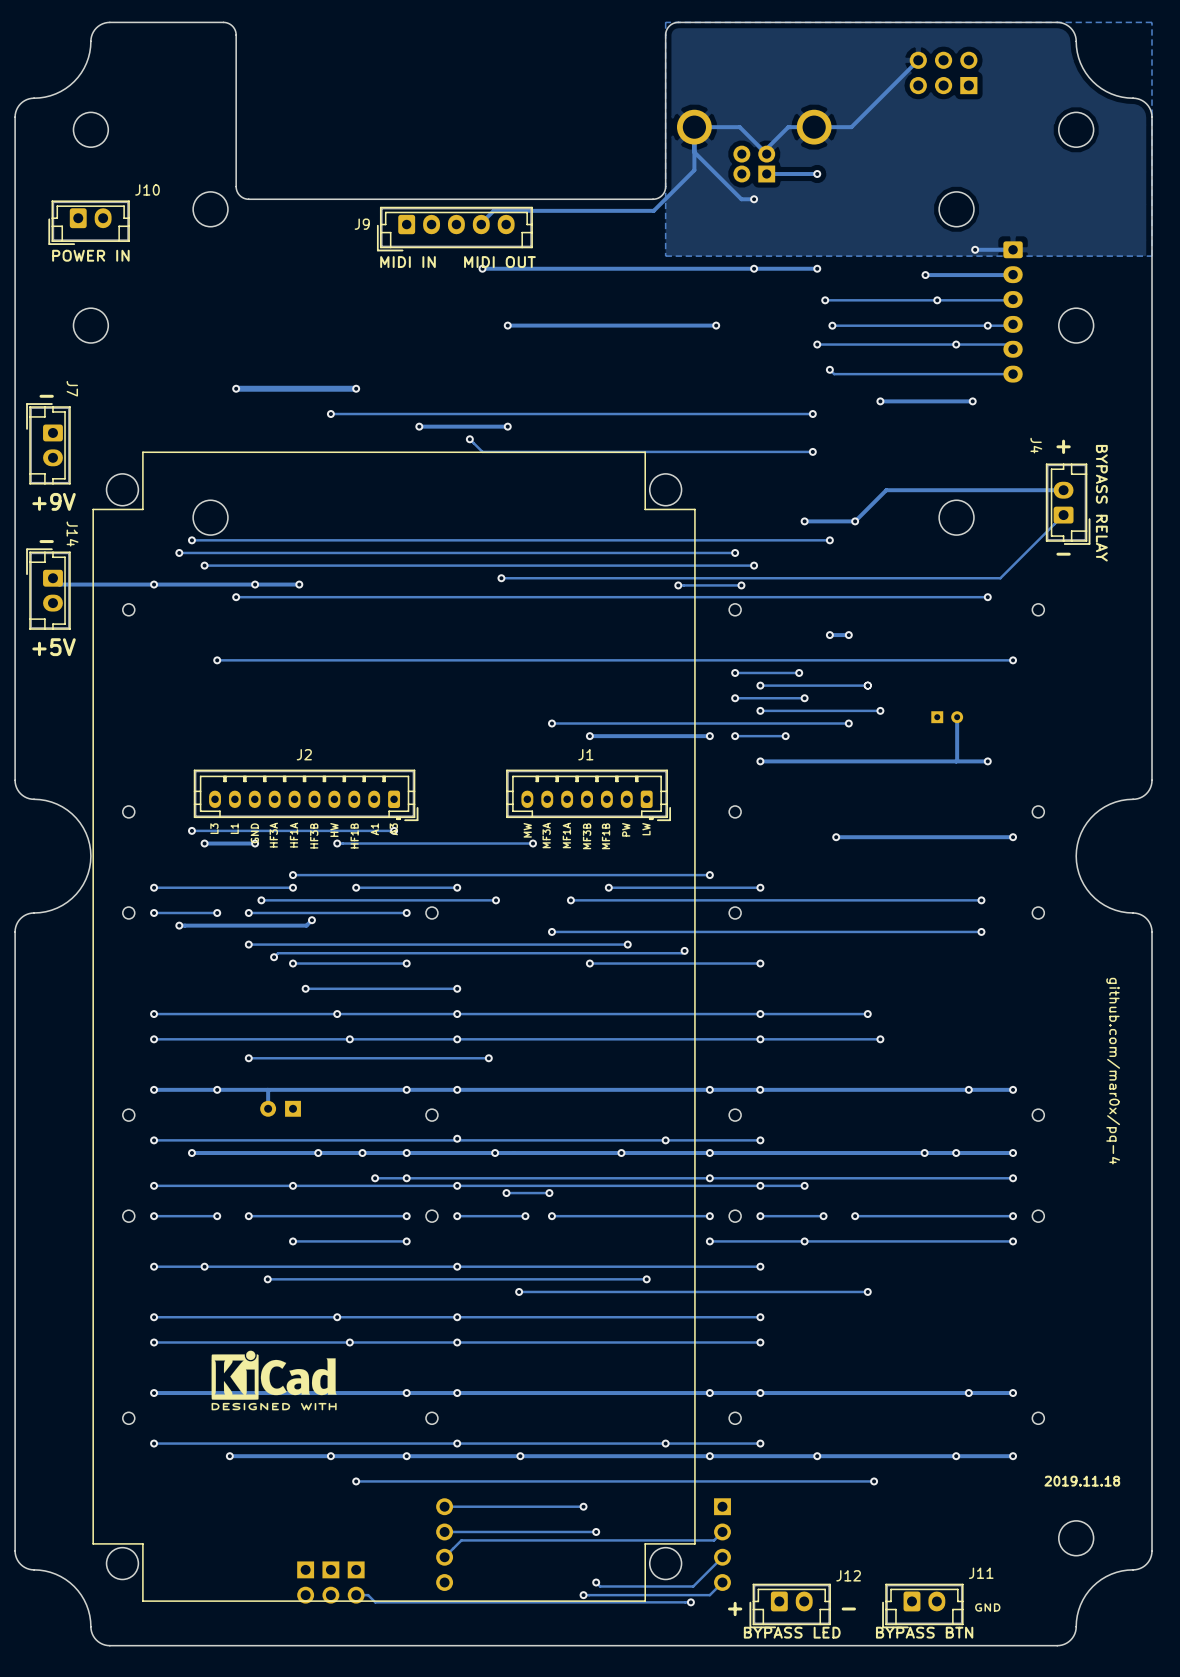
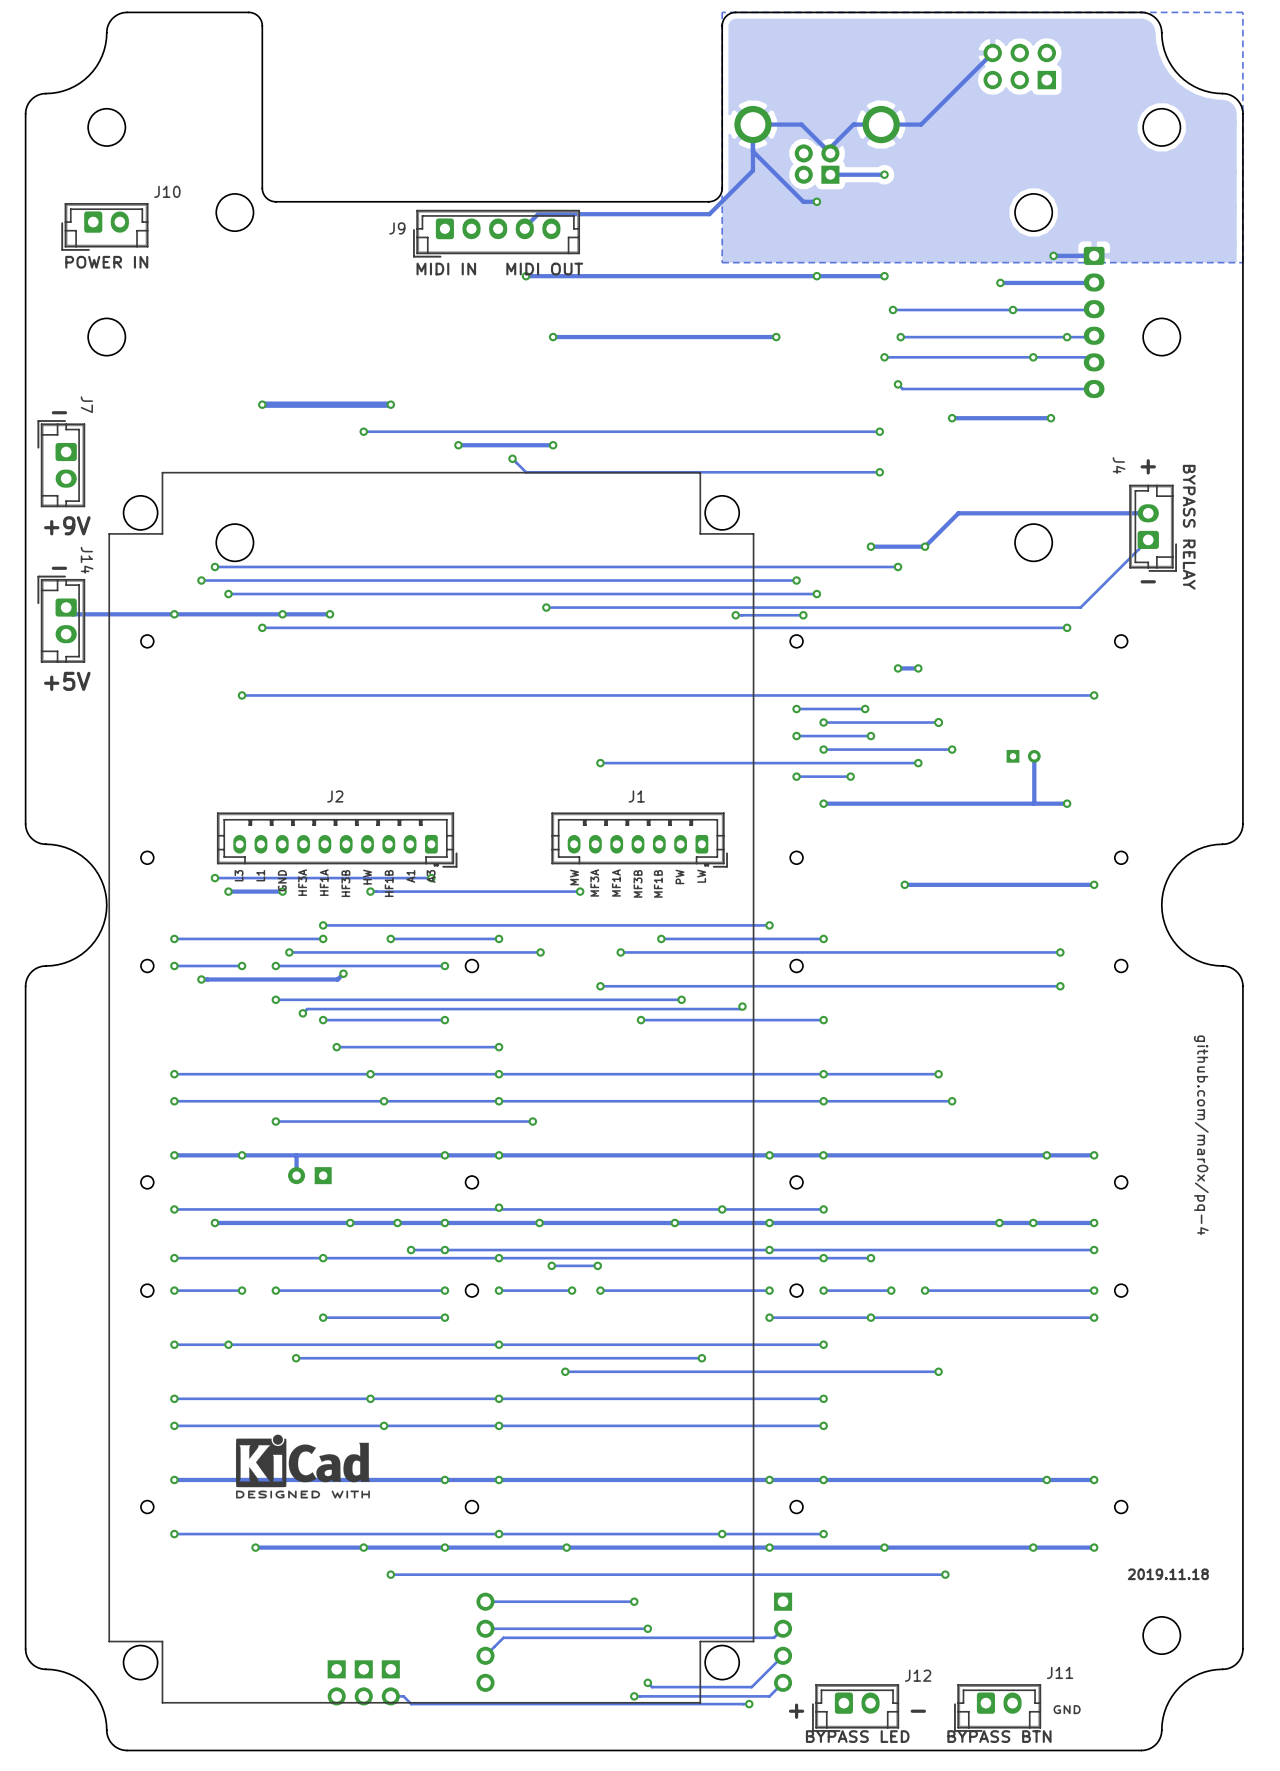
via: (589, 736) -> none
track: (709, 736) (589, 736) -> none
via: (709, 736) -> none

